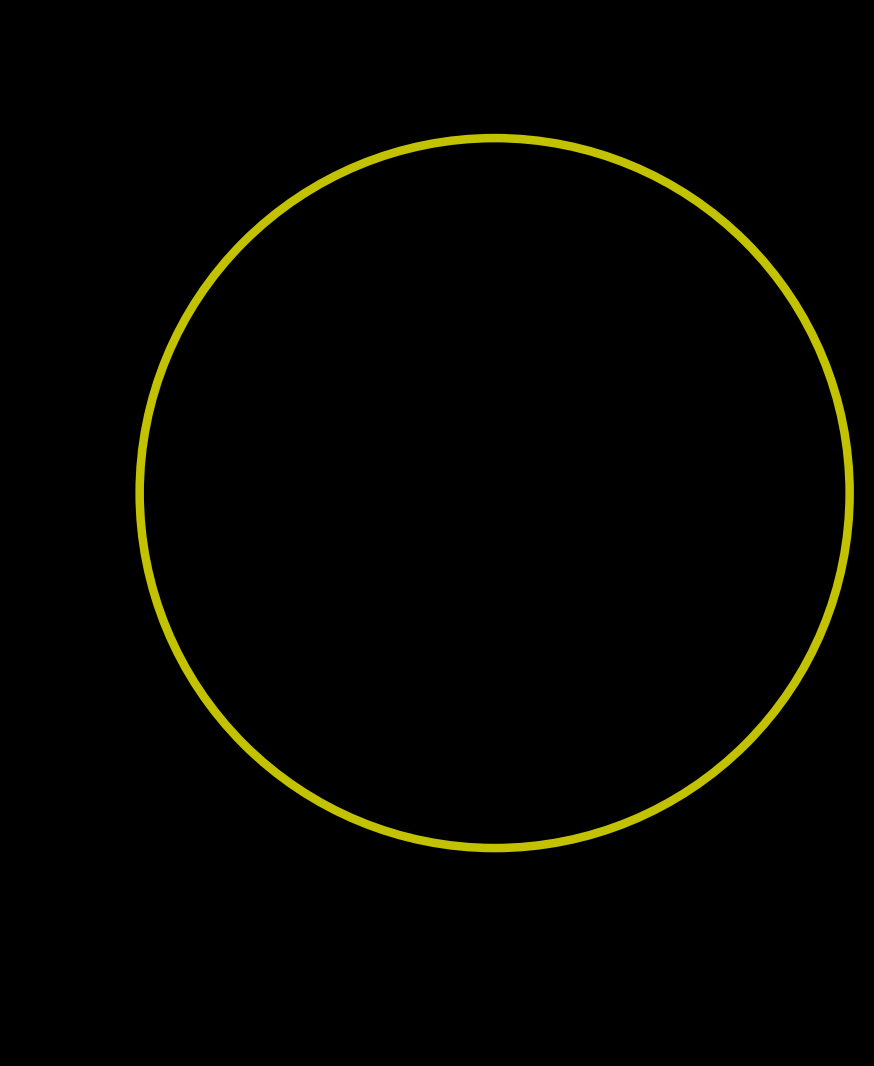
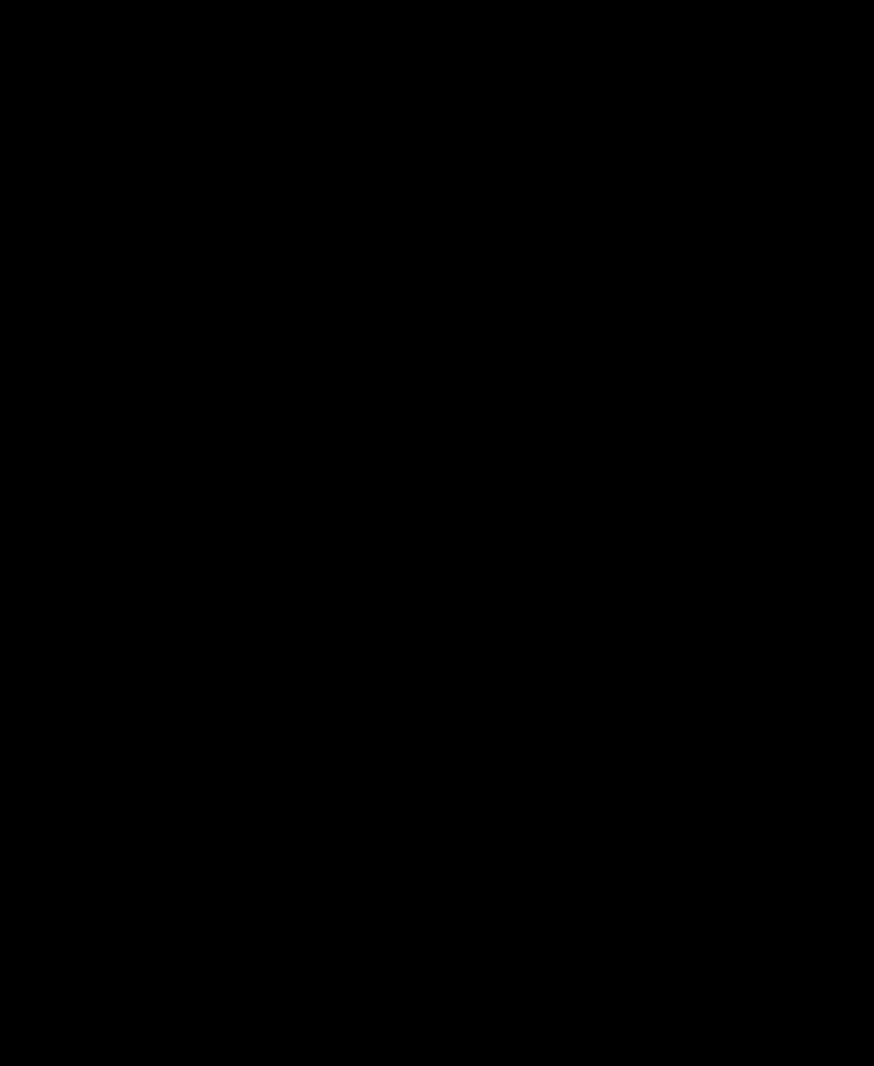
round board edge: [135, 133, 854, 853] -> none

